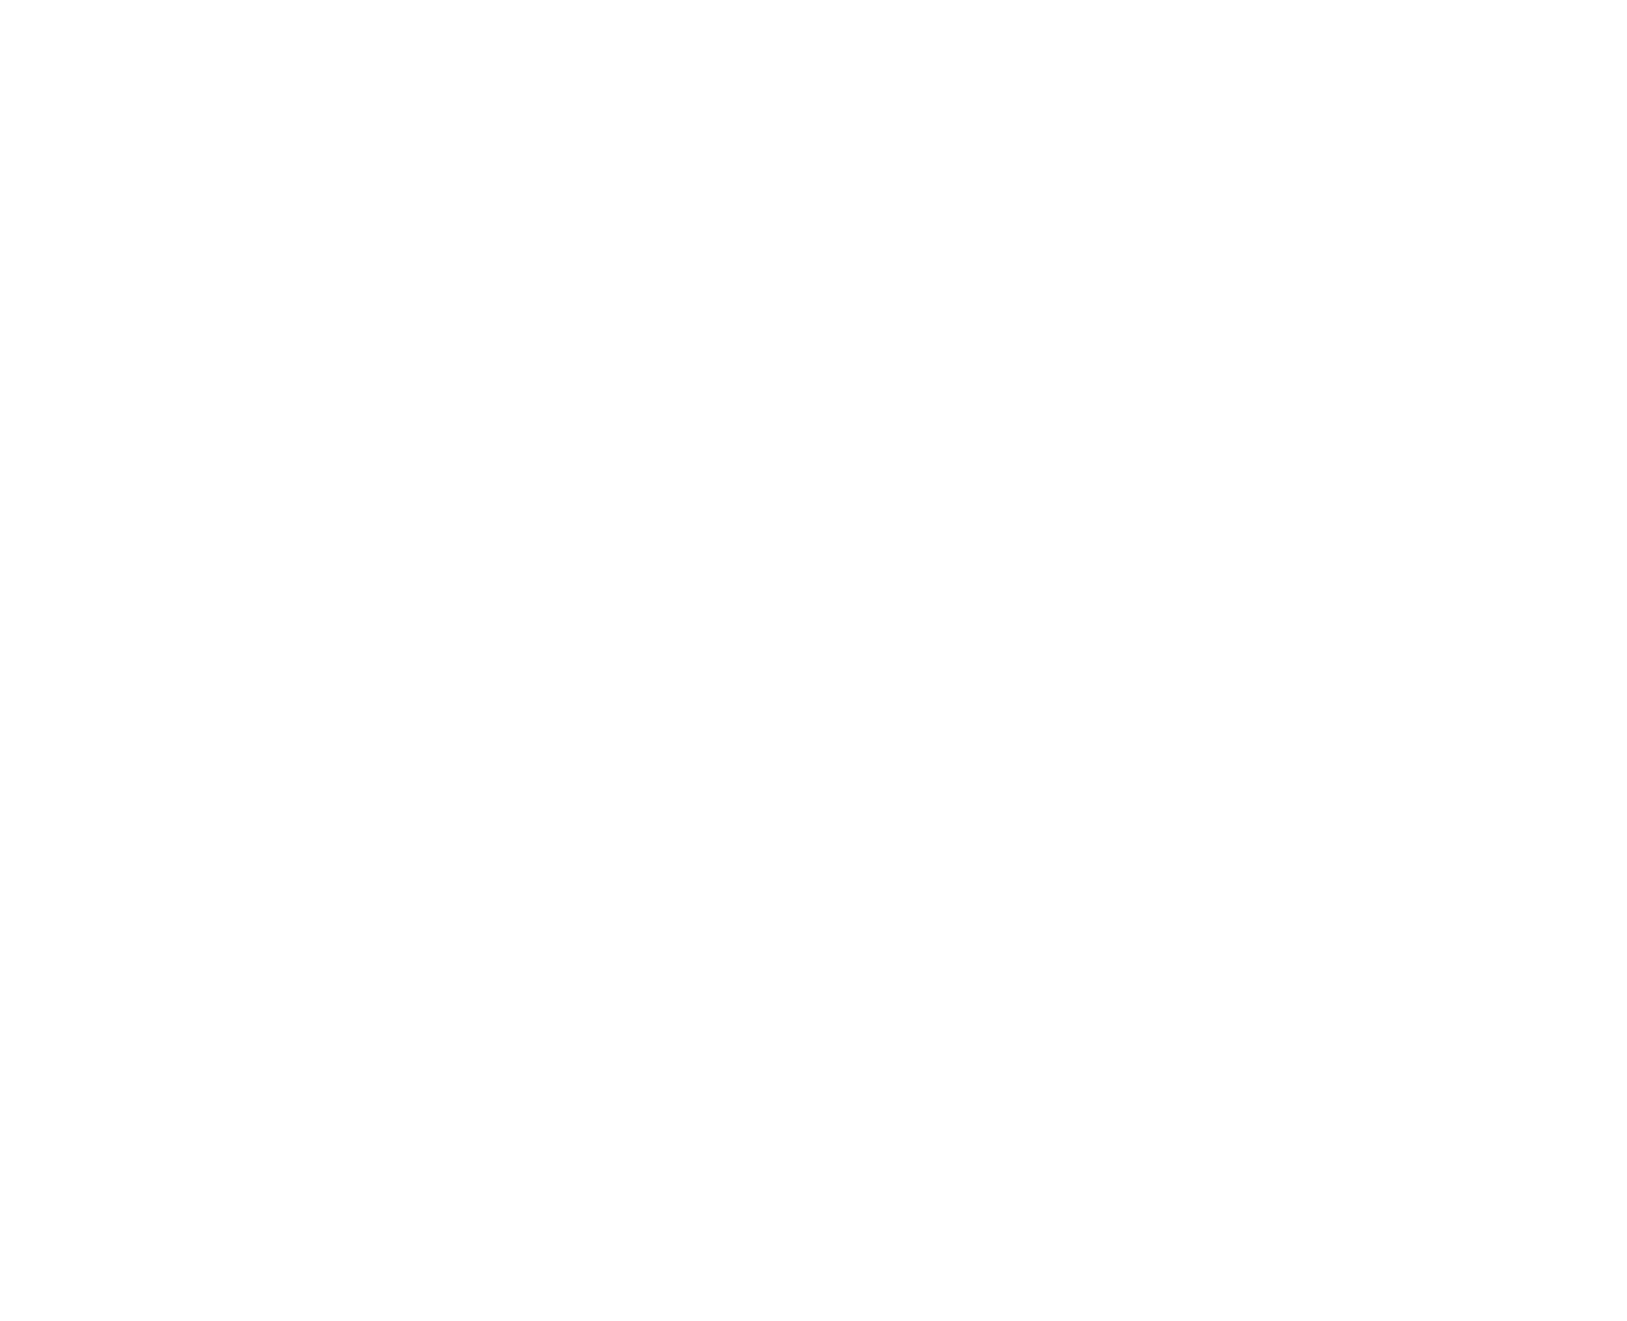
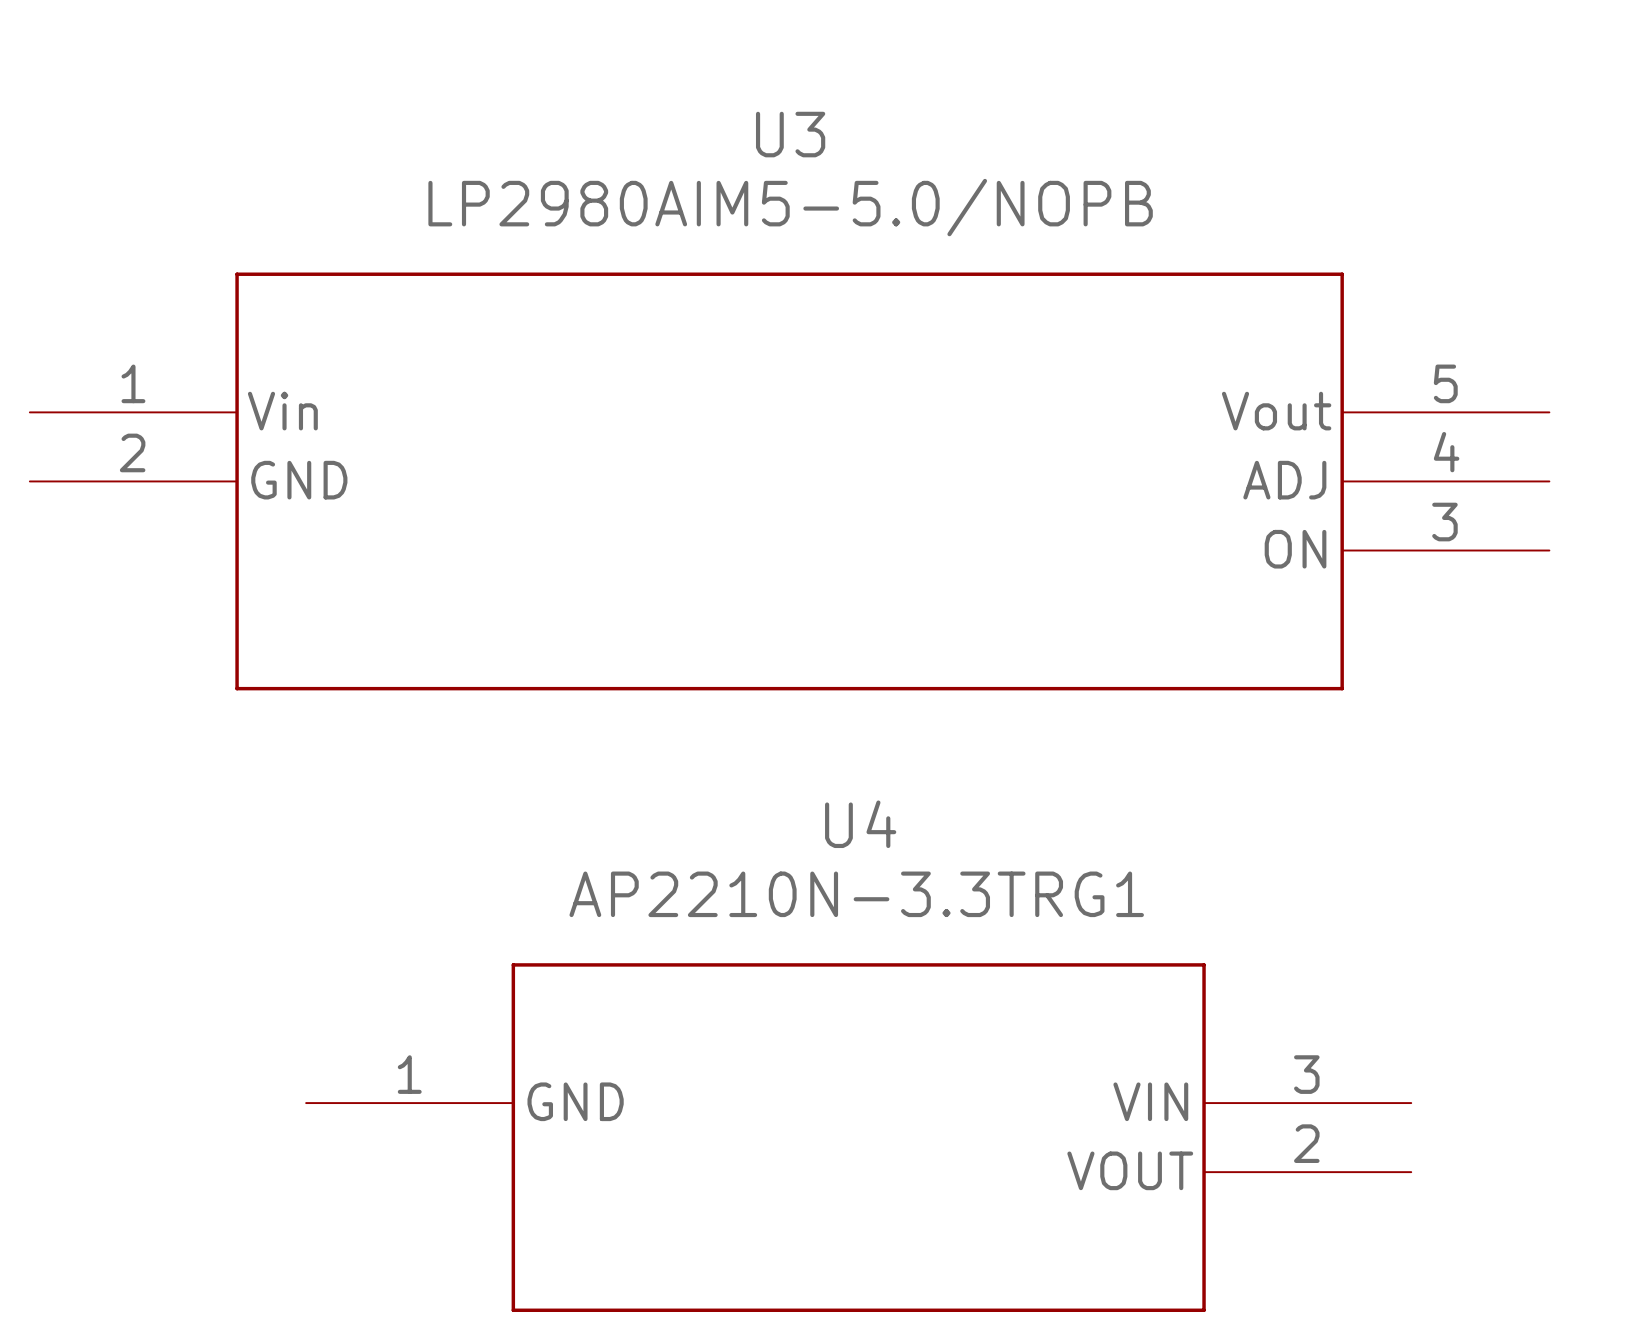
U3: none -> LP2980AIM5-5.0/NOPB (789, 481)
U4: none -> AP2210N-3.3TRG1 (858, 1137)

